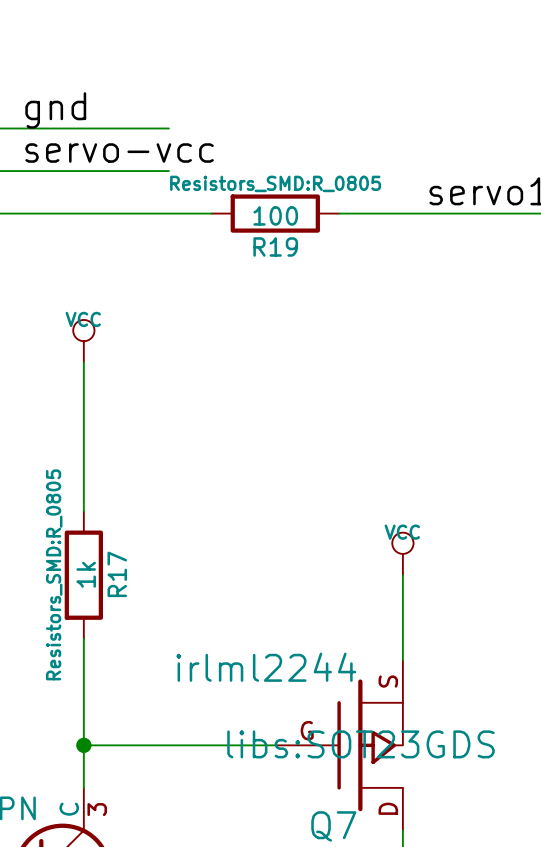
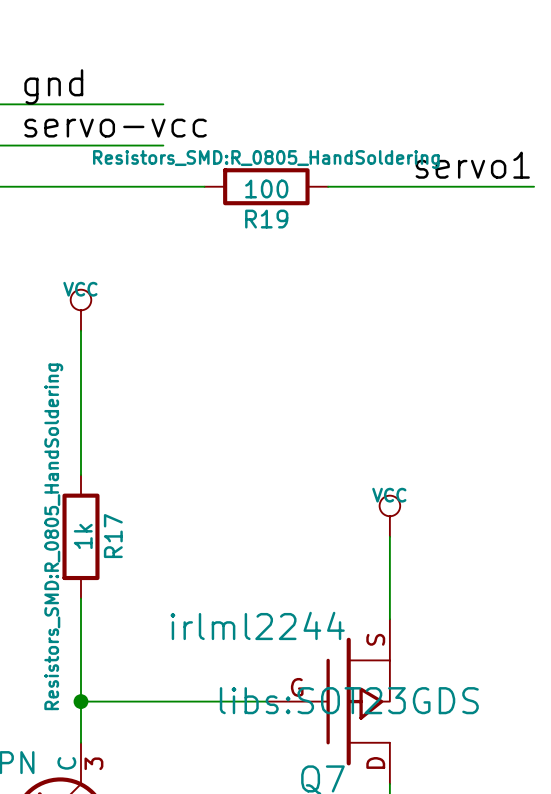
R19 text: Resistors_SMD:R_0805 (275, 183) -> Resistors_SMD:R_0805_HandSoldering (266, 159)
R17 text: Resistors_SMD:R_0805 (54, 574) -> Resistors_SMD:R_0805_HandSoldering (53, 536)

